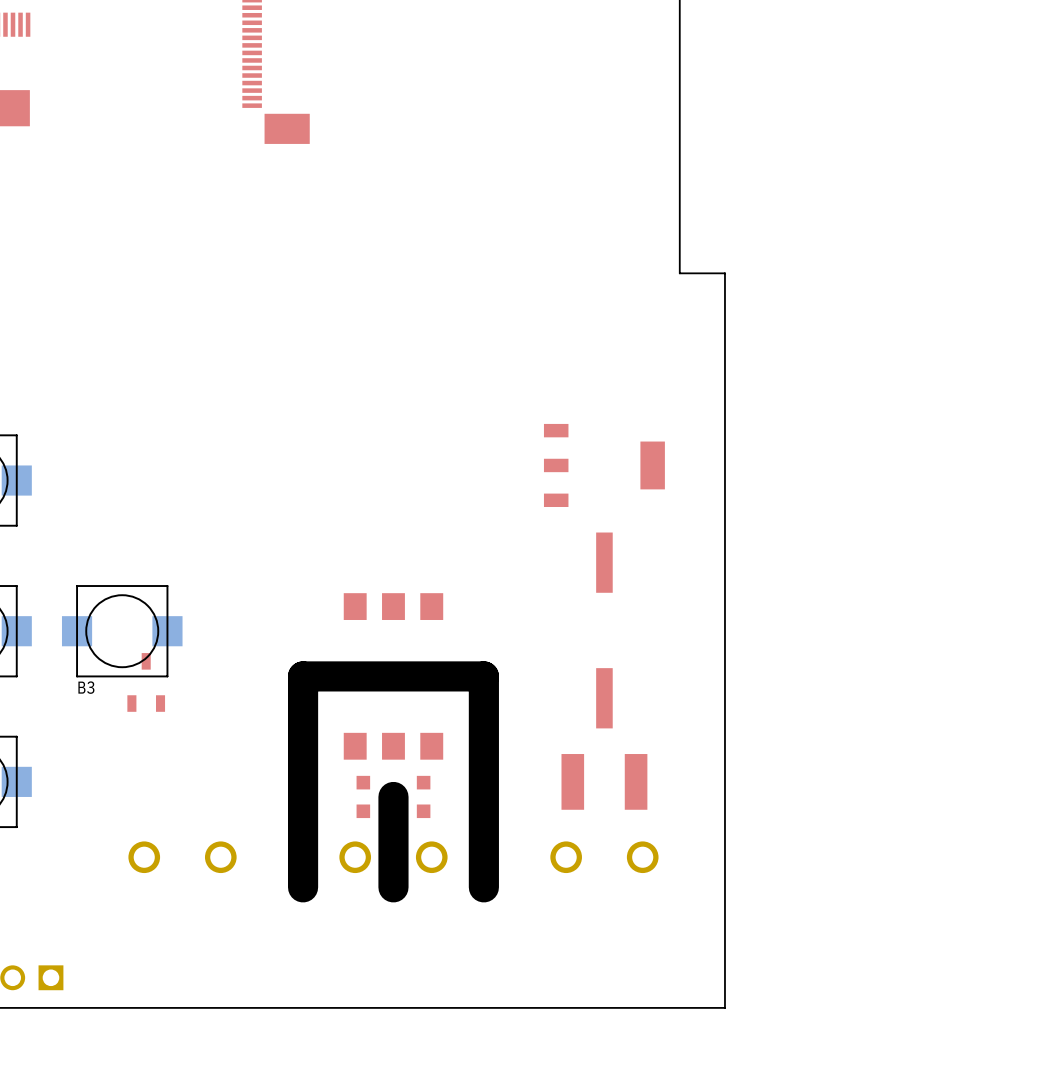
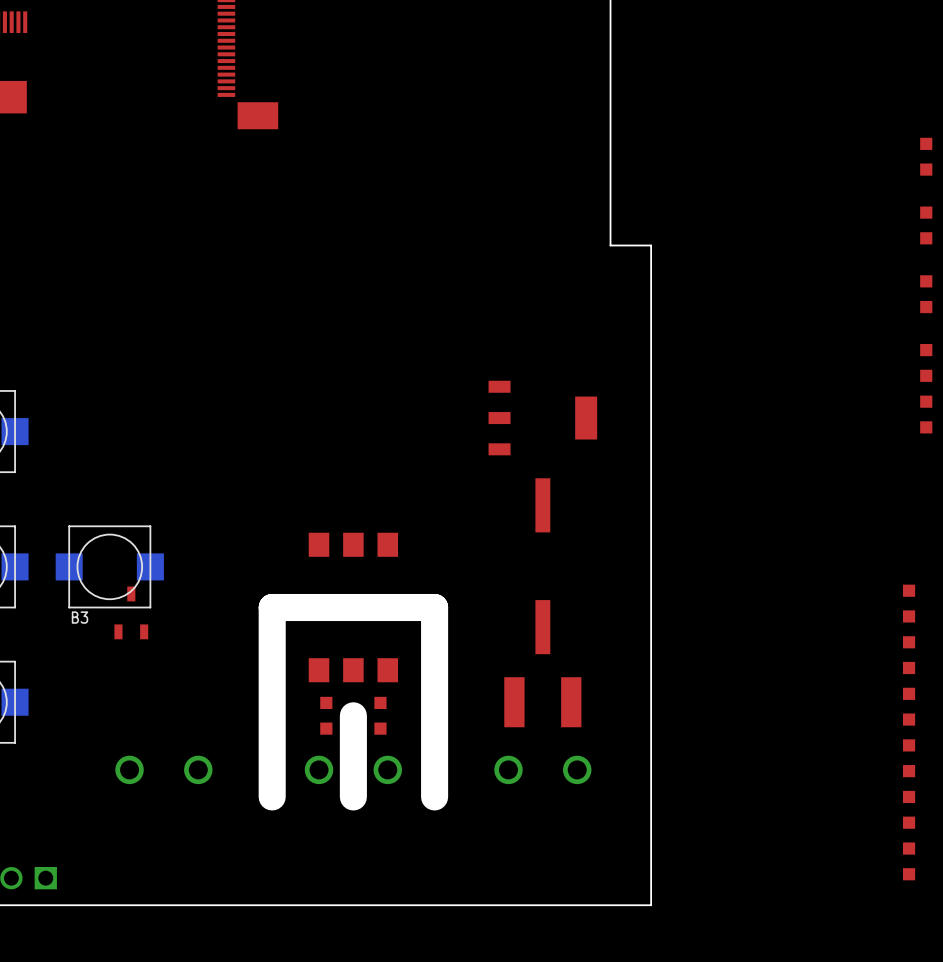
part: none -> (926, 156)
part: none -> (926, 225)
part: none -> (926, 294)
part: none -> (926, 362)
part: none -> (926, 414)
part: none -> (909, 603)
part: none -> (909, 655)
part: none -> (909, 706)
part: none -> (909, 758)
part: none -> (909, 809)
part: none -> (909, 861)

